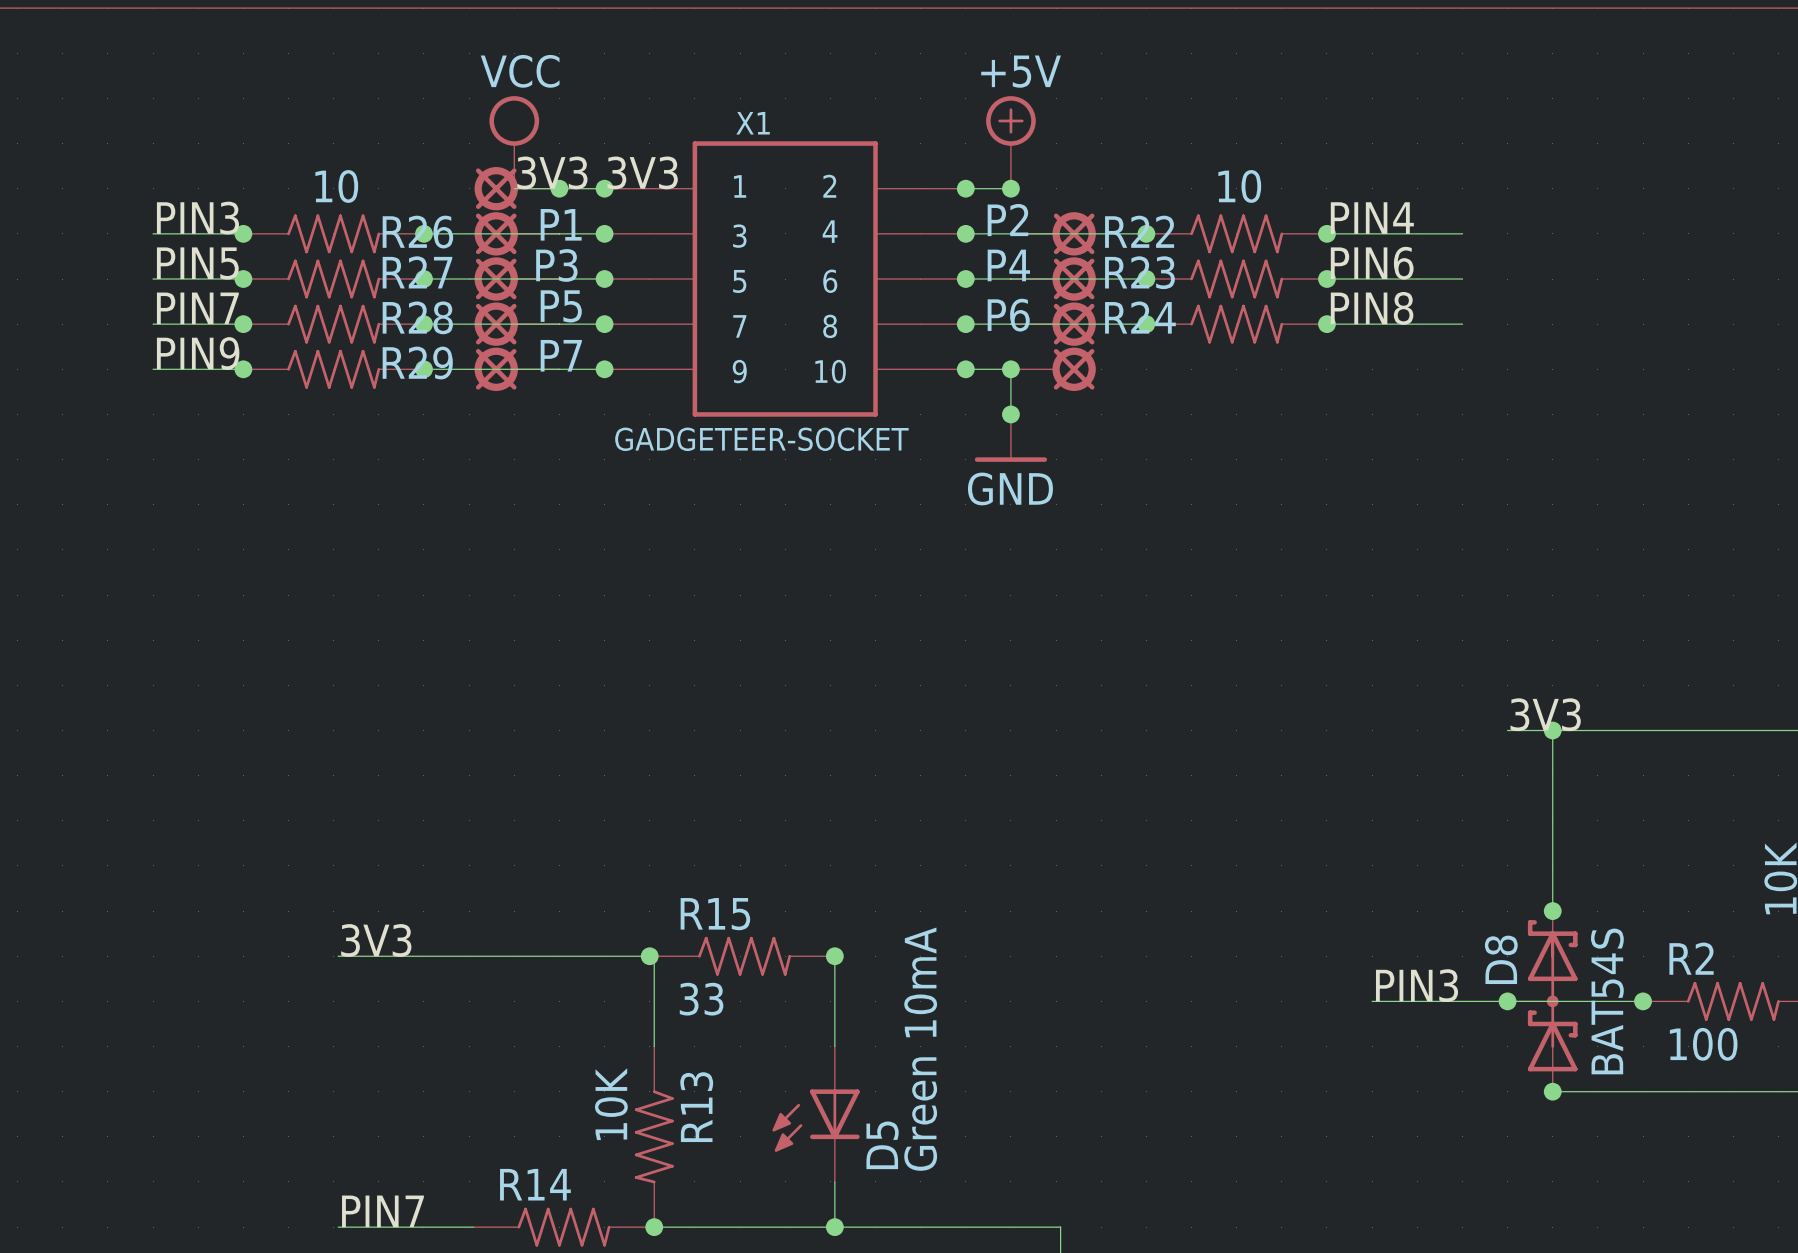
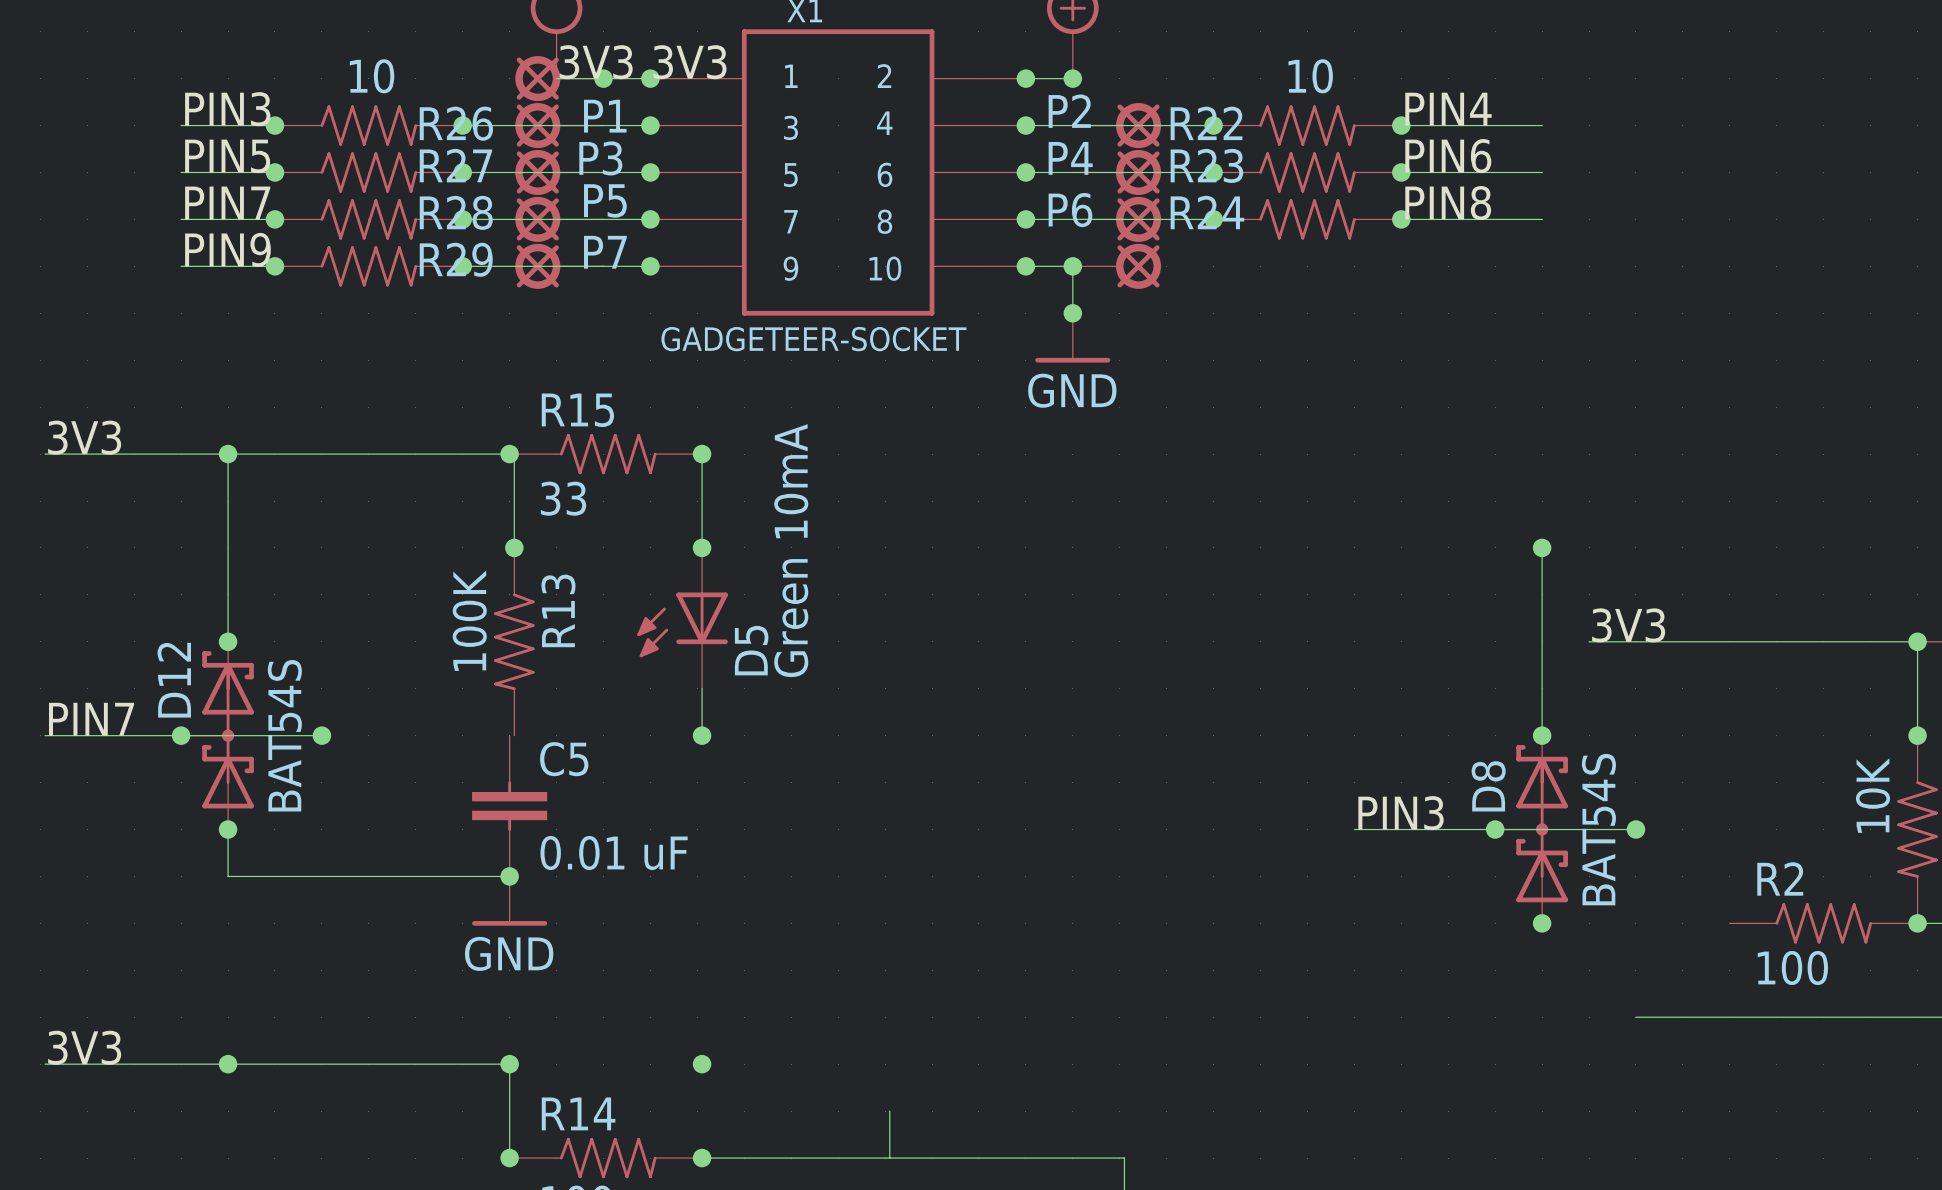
label: none -> 3V3 (84, 437)
wire: none -> (45, 454) (514, 454) (514, 547)
wire: none -> (228, 454) (228, 641)
junction: none -> (228, 454)
junction: none -> (509, 454)
wire: none -> (702, 454) (702, 547)
junction: none -> (702, 454)
junction: none -> (514, 547)
junction: none -> (702, 547)
wire: none -> (1542, 547) (1542, 735)
junction: none -> (1542, 547)
junction: none -> (228, 641)
wire: (1552, 730) (1552, 911) -> (1354, 829) (1635, 829)
junction: (1552, 730) -> none
wire: none -> (702, 688) (702, 735)
label: none -> PIN7 (91, 719)
wire: none -> (45, 735) (326, 735)
junction: none -> (181, 735)
D12: none -> BAT54S (217, 735)
junction: none -> (321, 735)
junction: none -> (702, 735)
junction: none -> (1542, 735)
C5: none -> 0.01 uF (509, 806)
wire: none -> (228, 829) (228, 876) (373, 876)
junction: none -> (228, 829)
junction: none -> (1495, 829)
label: 3V3 (376, 940) -> none
wire: (469, 956) (654, 956) (654, 1046) -> none
junction: none -> (509, 876)
junction: (649, 956) -> none
R15 position: (744, 956) -> (608, 454)
wire: (834, 956) (834, 1046) -> (509, 1064) (509, 1158)
junction: (834, 956) -> none
power symbol: none -> GND (509, 901)
label position: PIN3 (1417, 985) -> PIN3 (1401, 813)
wire: (1372, 1001) (1643, 1001) -> none
junction position: (1507, 1001) -> (1542, 923)
D8 position: (1542, 1001) -> (1531, 829)
junction: (1643, 1001) -> none
junction: (1552, 1091) -> none
R13 value: 10K (611, 1104) -> 100K (469, 620)
D5 position: (816, 1114) -> (682, 618)
label: none -> 3V3 (84, 1047)
wire: none -> (45, 1064) (514, 1064)
junction: none -> (228, 1064)
junction: none -> (509, 1064)
R13 position: (654, 1136) -> (514, 641)
junction: none -> (702, 1064)
label: PIN7 (382, 1211) -> none
wire: (338, 1227) (473, 1227) -> none
junction: none -> (509, 1158)
junction: (834, 1227) -> none

